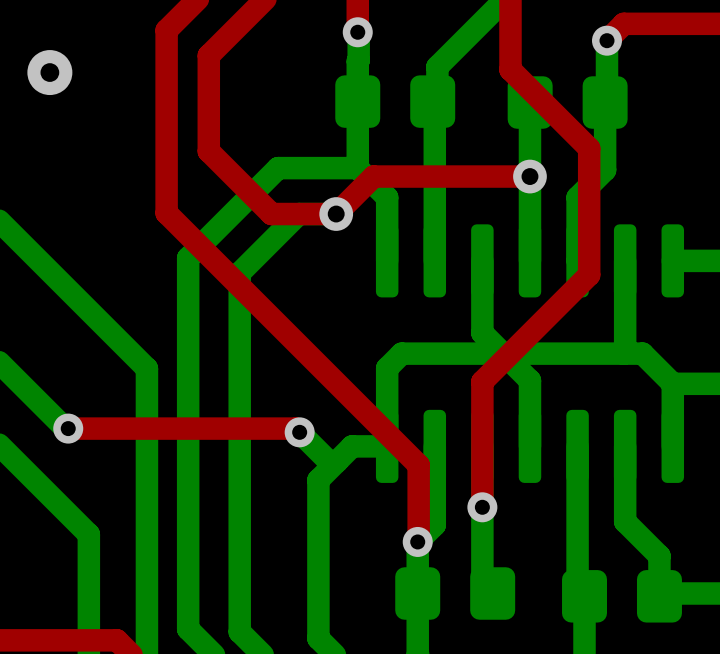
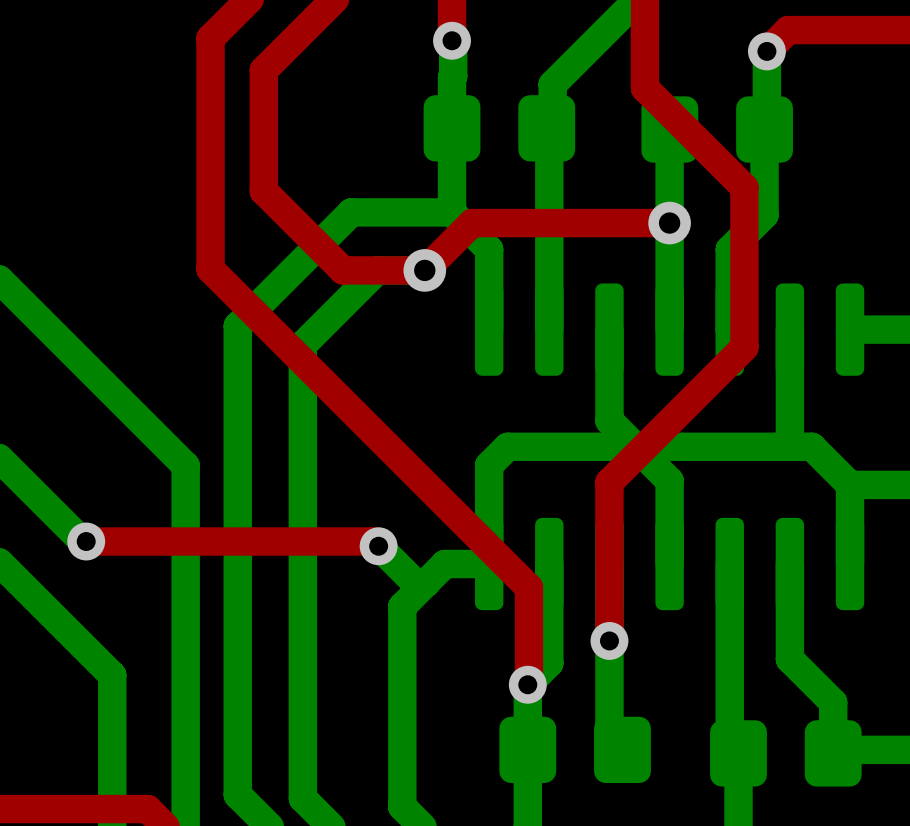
via: (49, 72) -> none

